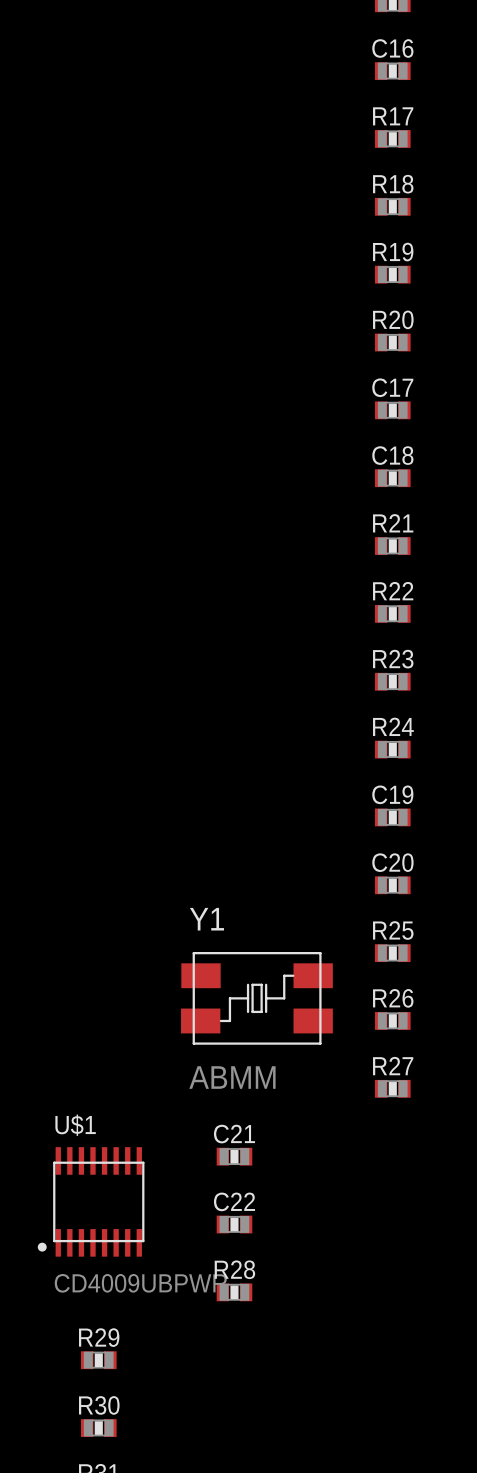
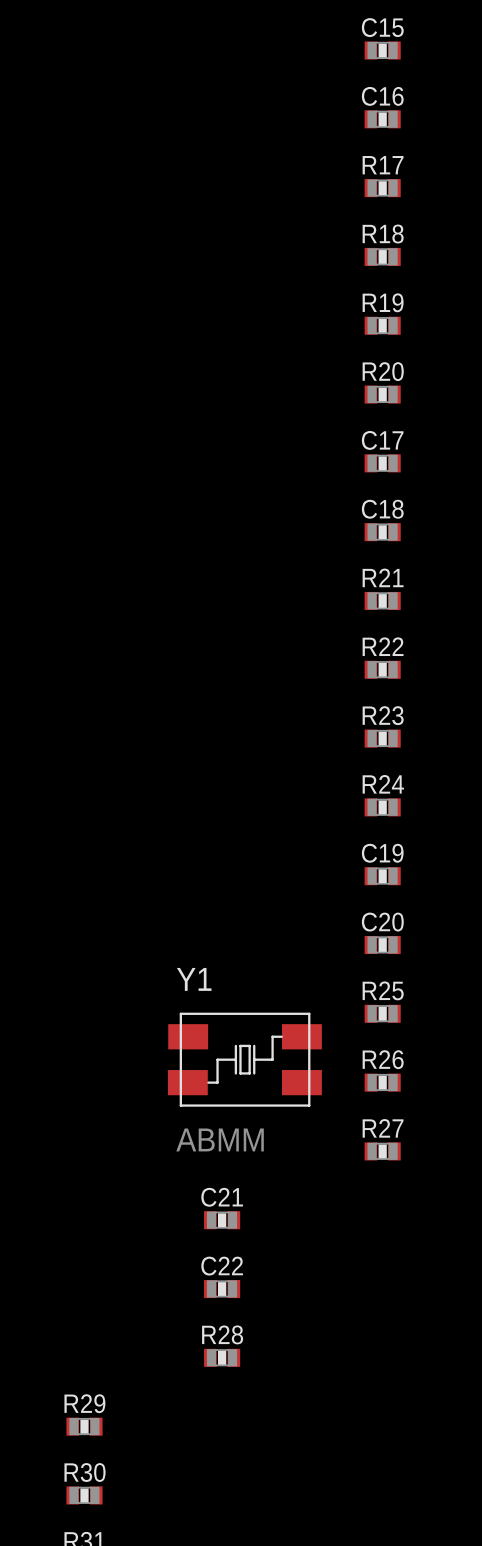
U$1: CD4009UBPWR (91, 1201) -> none

